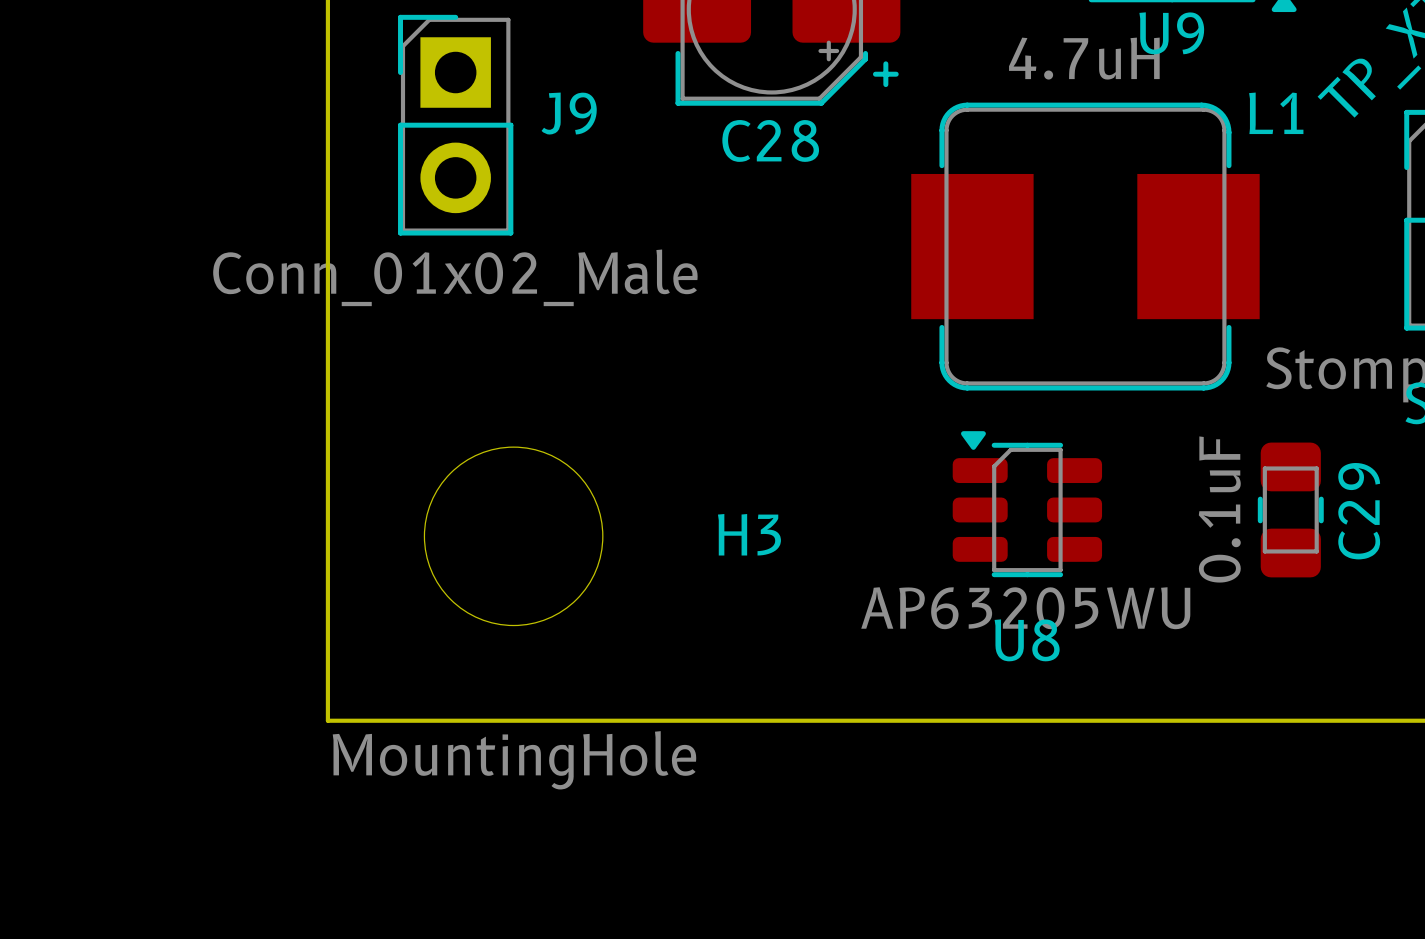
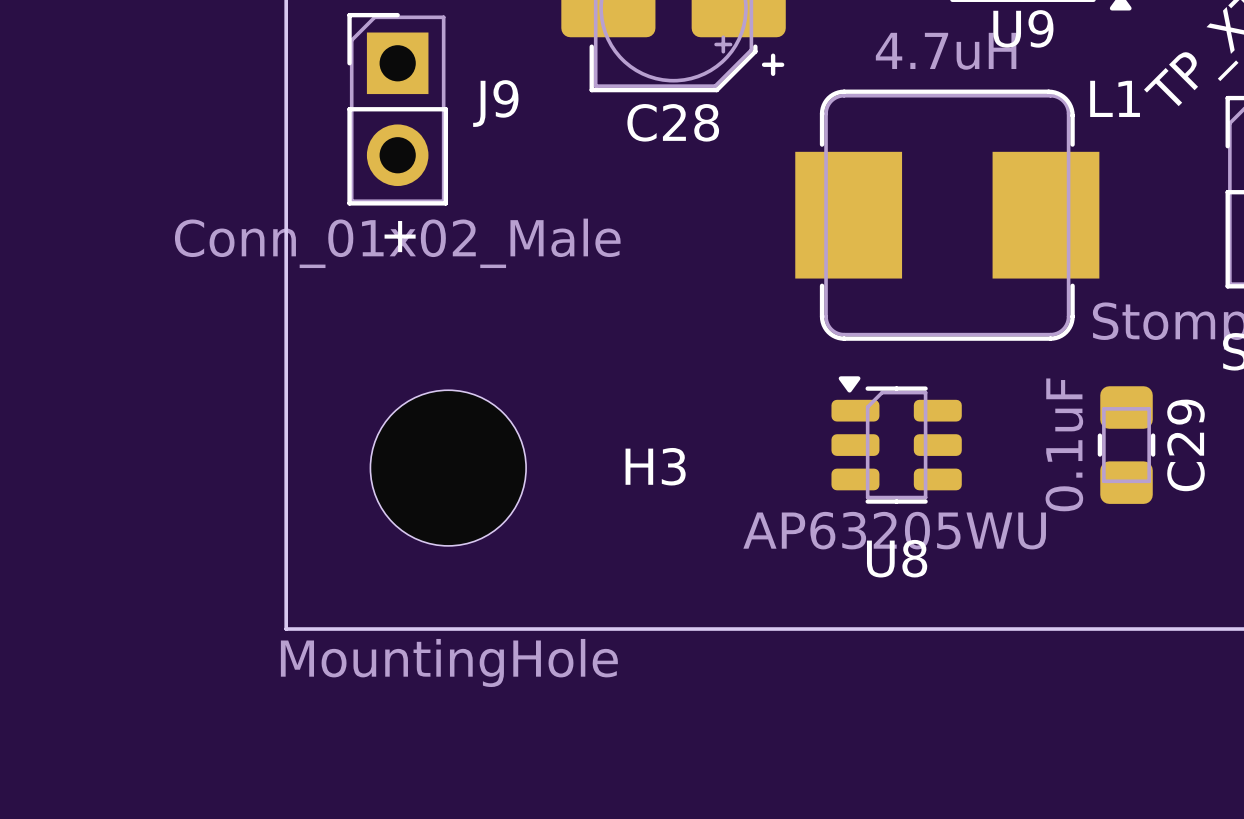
text: none -> + (400, 236)

